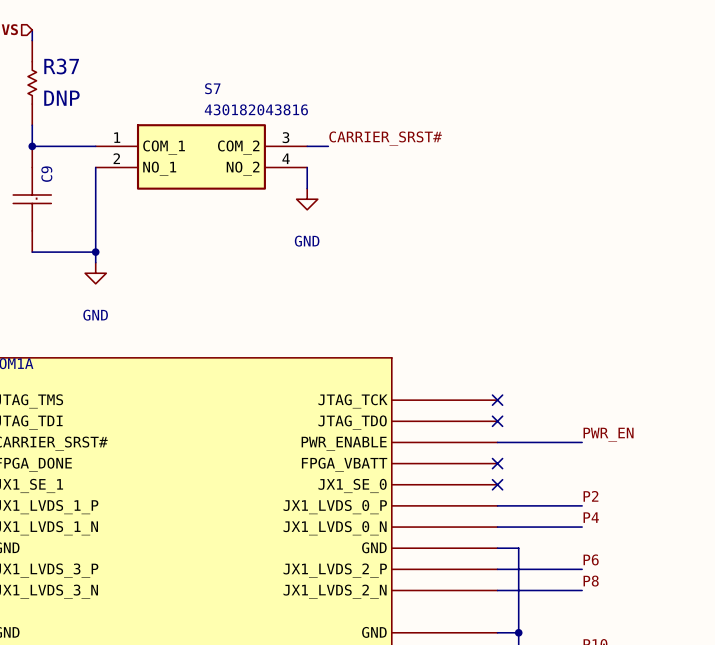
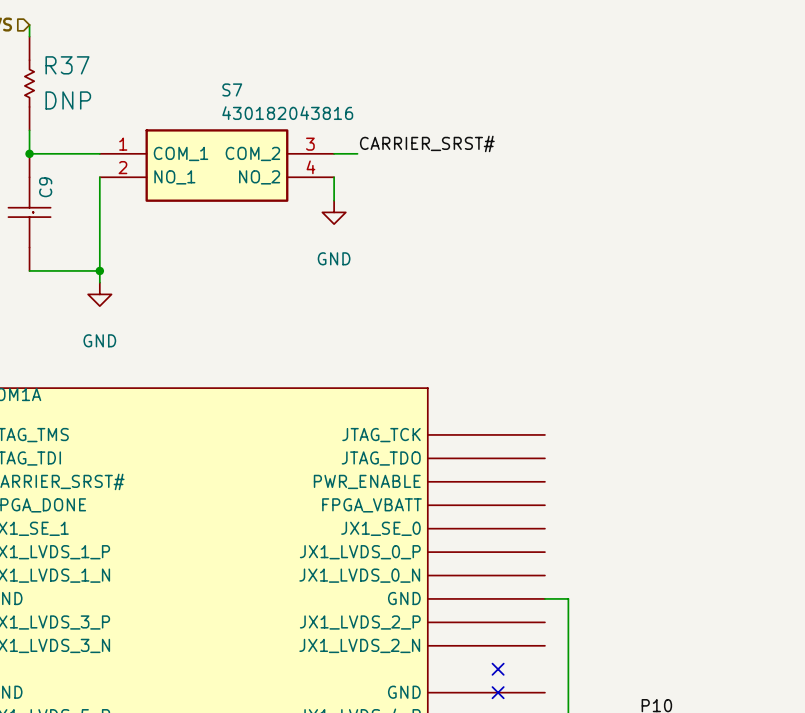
no-connect mark: (497, 400) -> none
no-connect mark: (497, 421) -> none
label: PWR_EN (608, 434) -> none
wire: (497, 442) (582, 442) -> none
no-connect mark: (497, 463) -> none
no-connect mark: (497, 484) -> none
label: P2 (590, 496) -> none
wire: (497, 505) (582, 505) -> none
label: P4 (591, 517) -> none
wire: (497, 527) (582, 527) -> none
label: P6 (591, 559) -> none
wire: (497, 569) (582, 569) -> none
label: P8 (591, 581) -> none
wire: (497, 590) (582, 590) -> none
no-connect mark: none -> (498, 669)
no-connect mark: none -> (498, 692)
wire: (497, 632) (518, 632) -> none
junction: (518, 632) -> none

